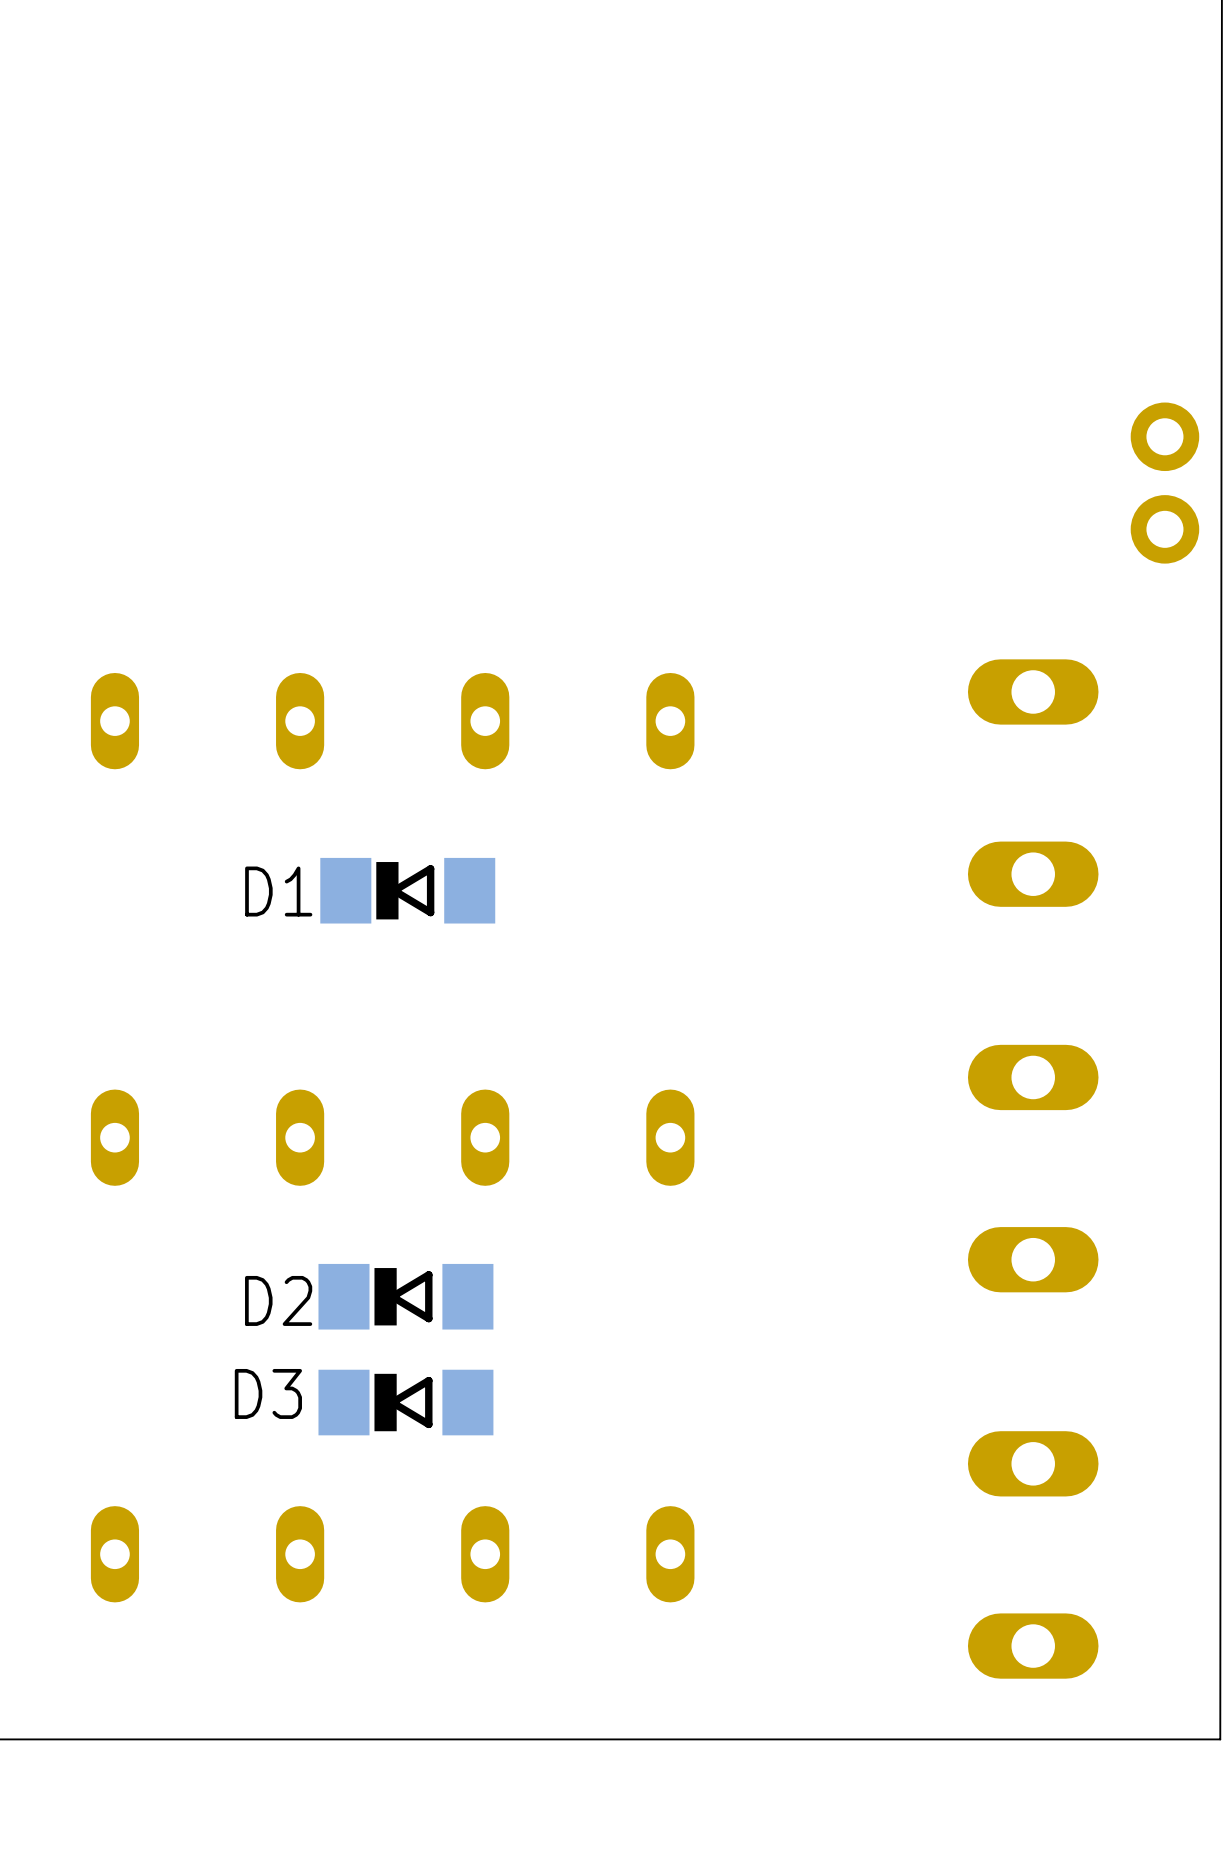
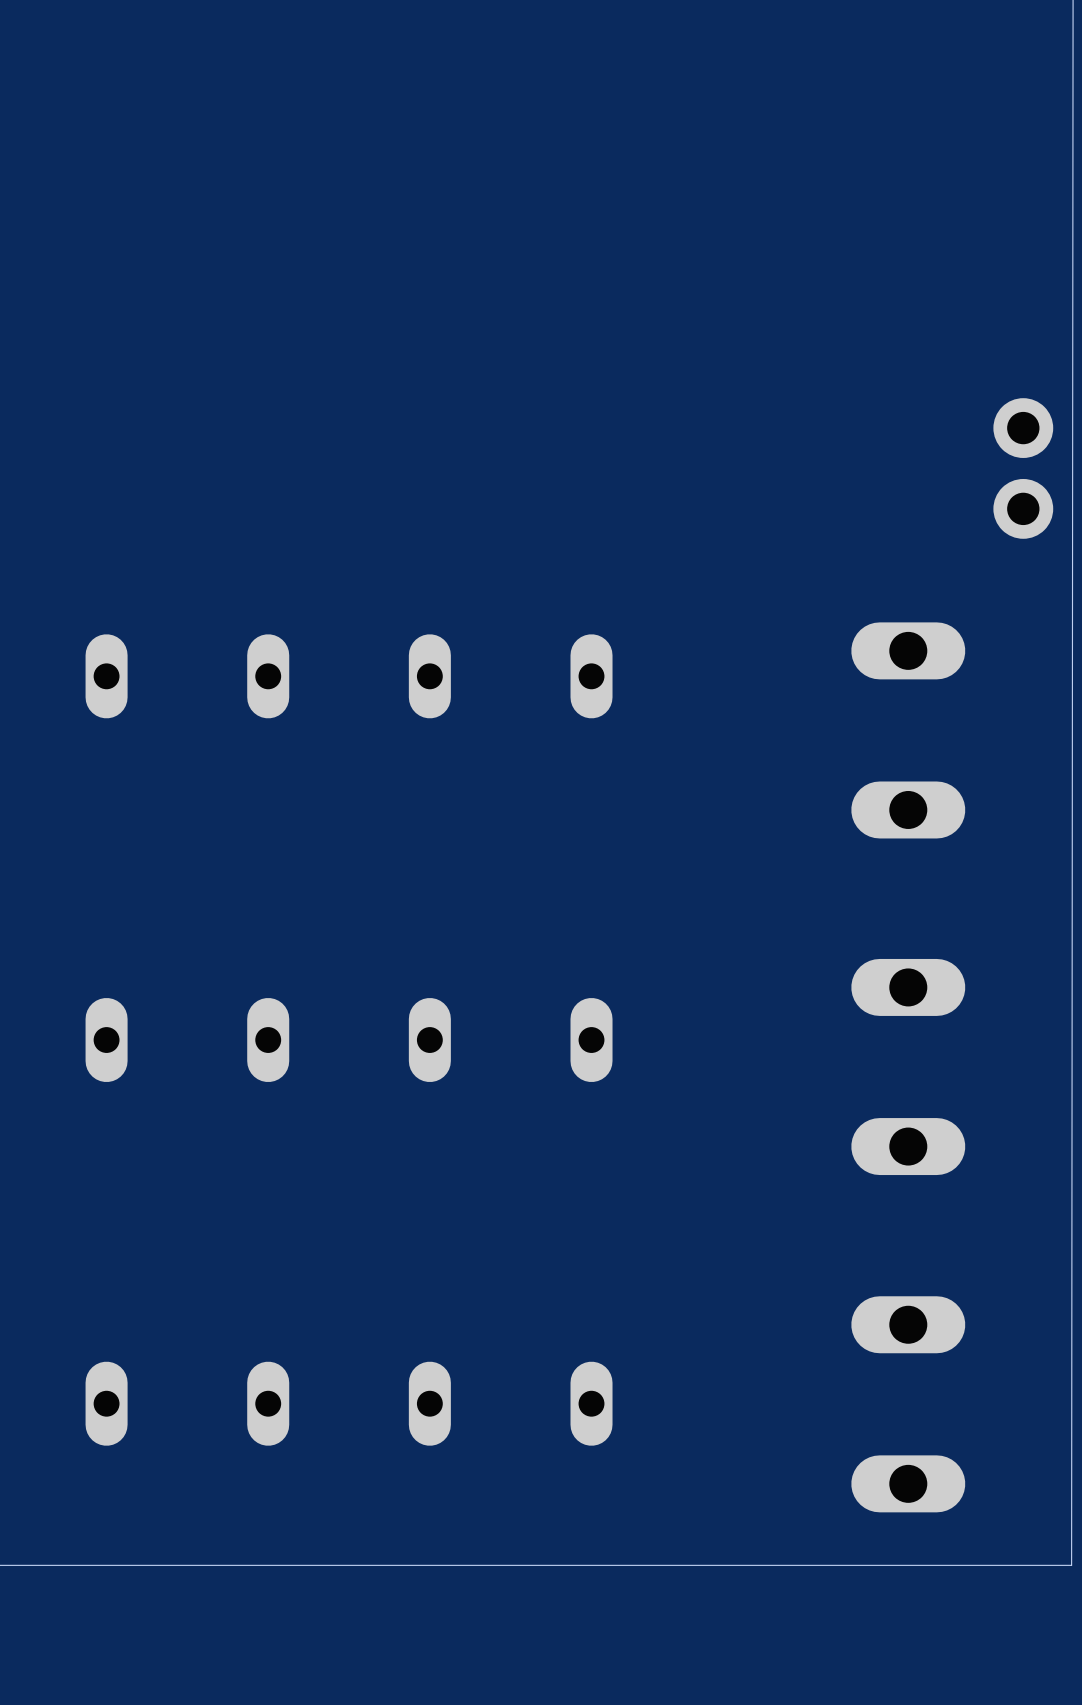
D1: (407, 890) -> none
D2: (405, 1296) -> none
D3: (405, 1402) -> none

